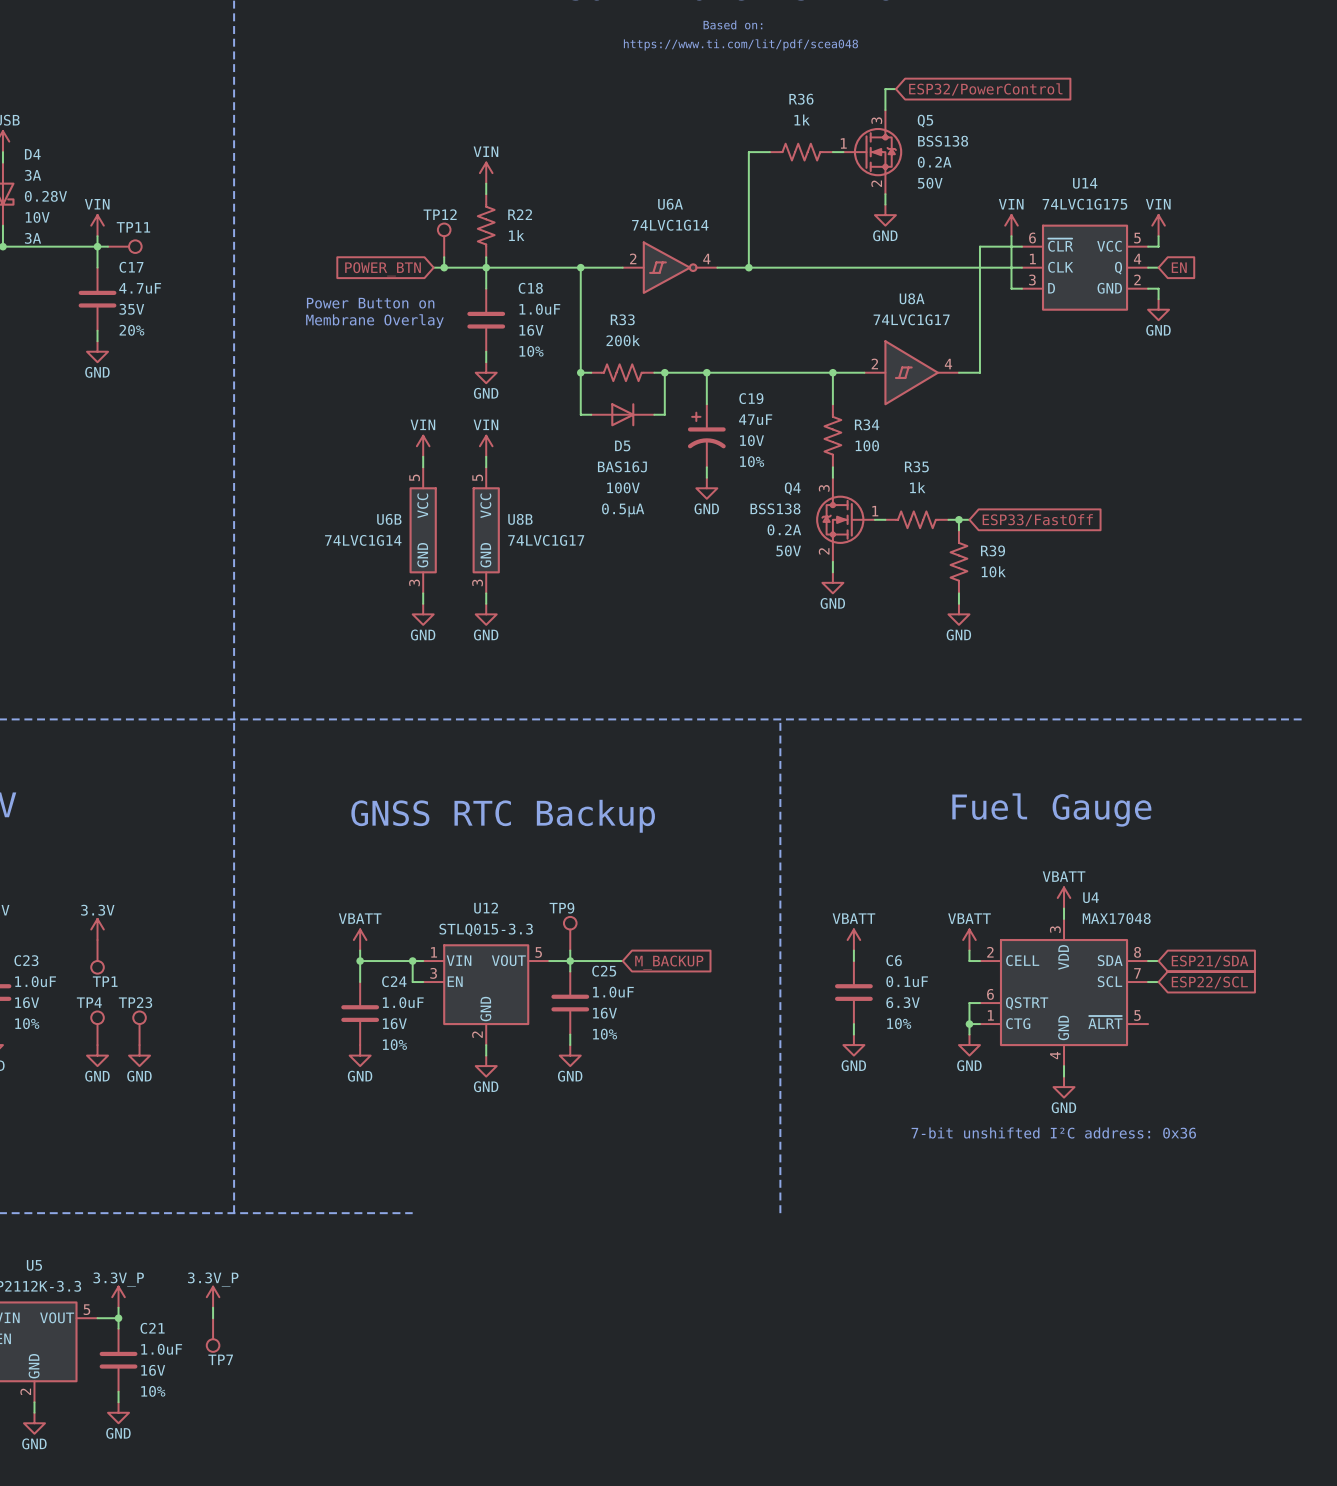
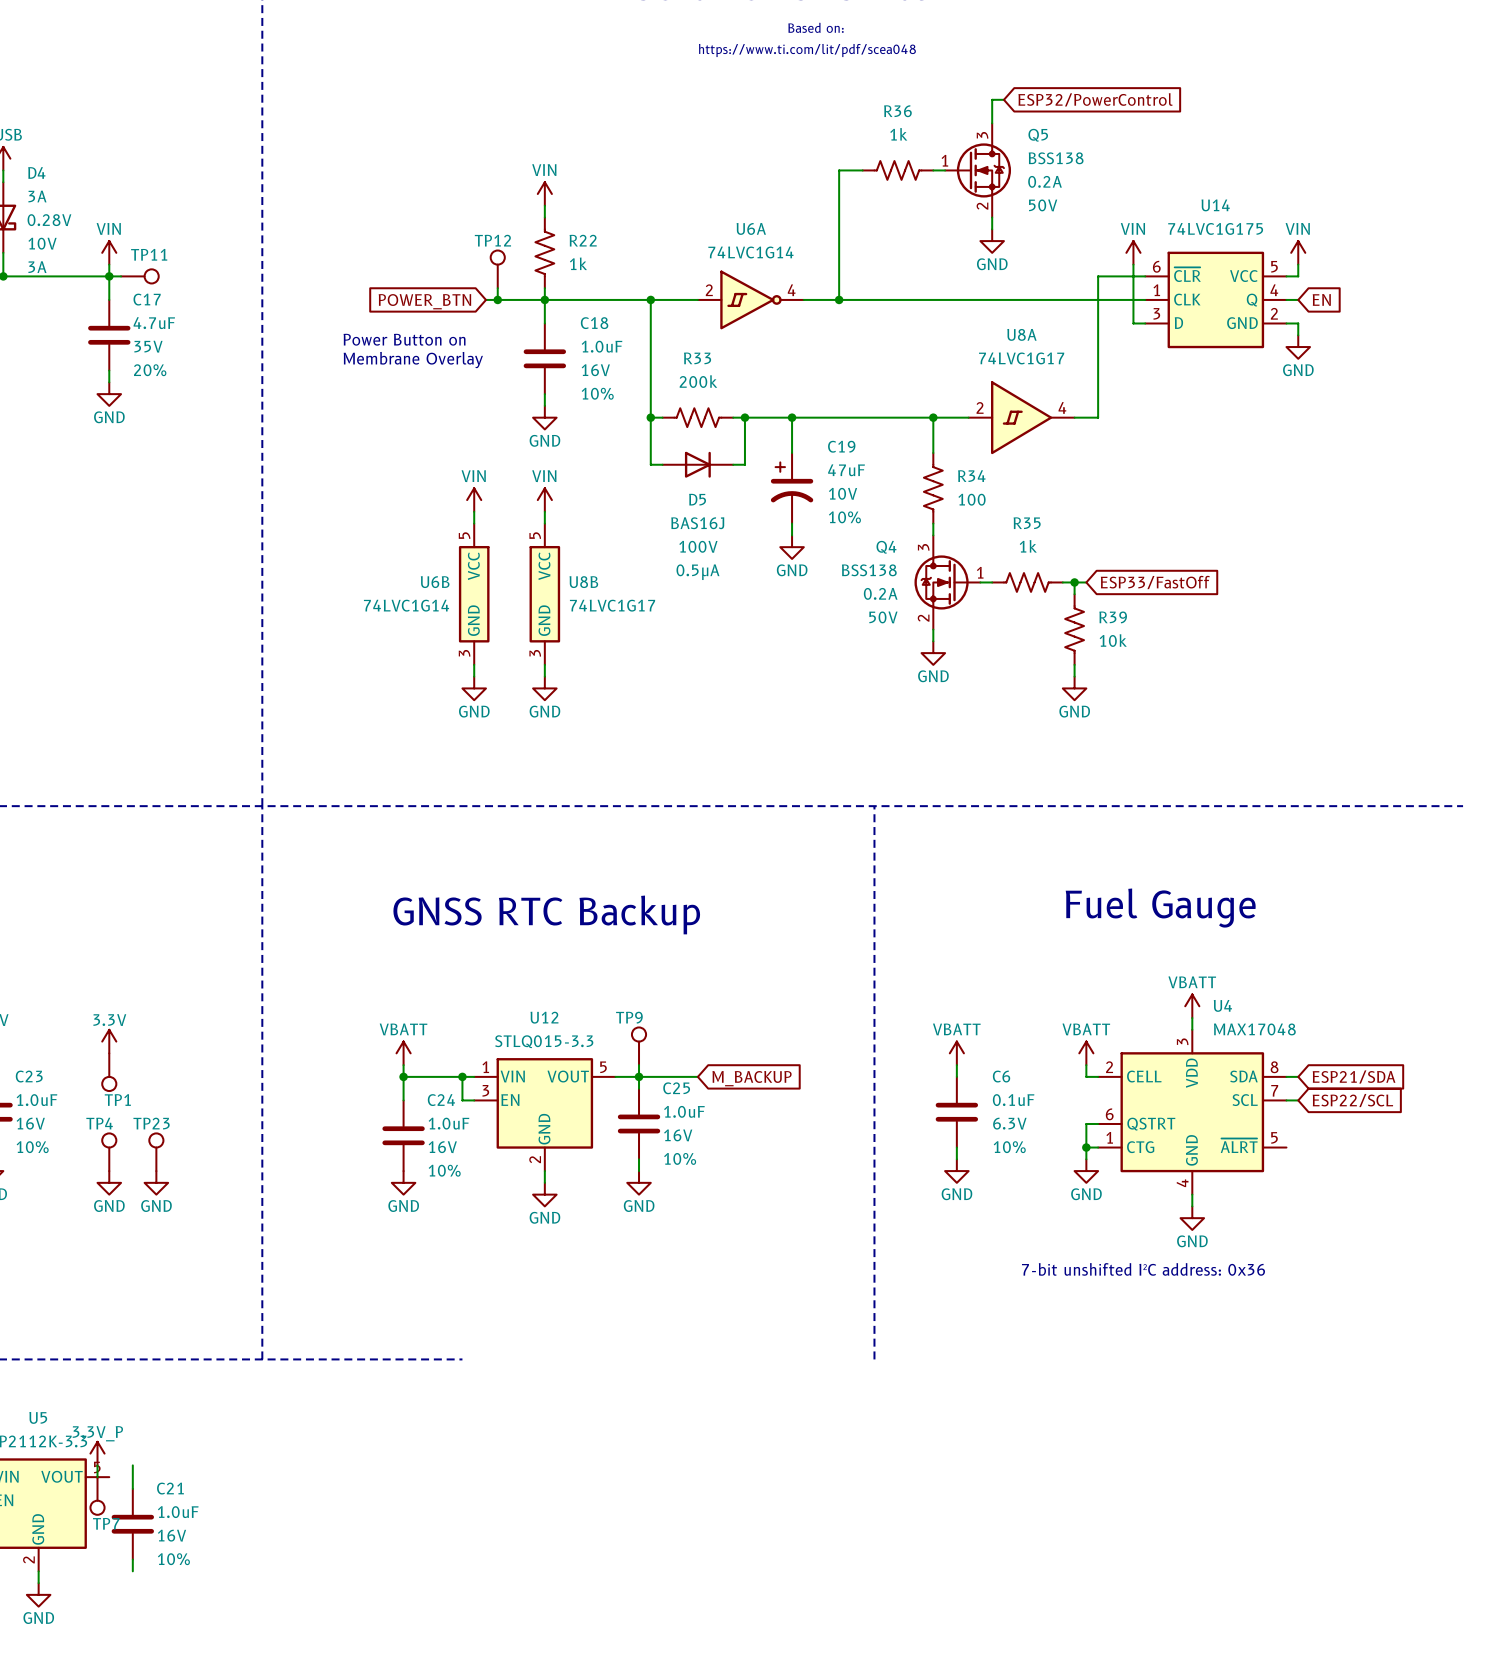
power symbol position: 3.3V_P (118, 1297) -> 3.3V_P (97, 1453)
power symbol: 3.3V_P (213, 1297) -> none
wire: (213, 1307) (213, 1318) -> (97, 1465) (97, 1477)
wire: (97, 1318) (118, 1318) -> none
junction: (118, 1318) -> none
TP7 position: (213, 1335) -> (97, 1495)
power symbol: GND (118, 1412) -> none

